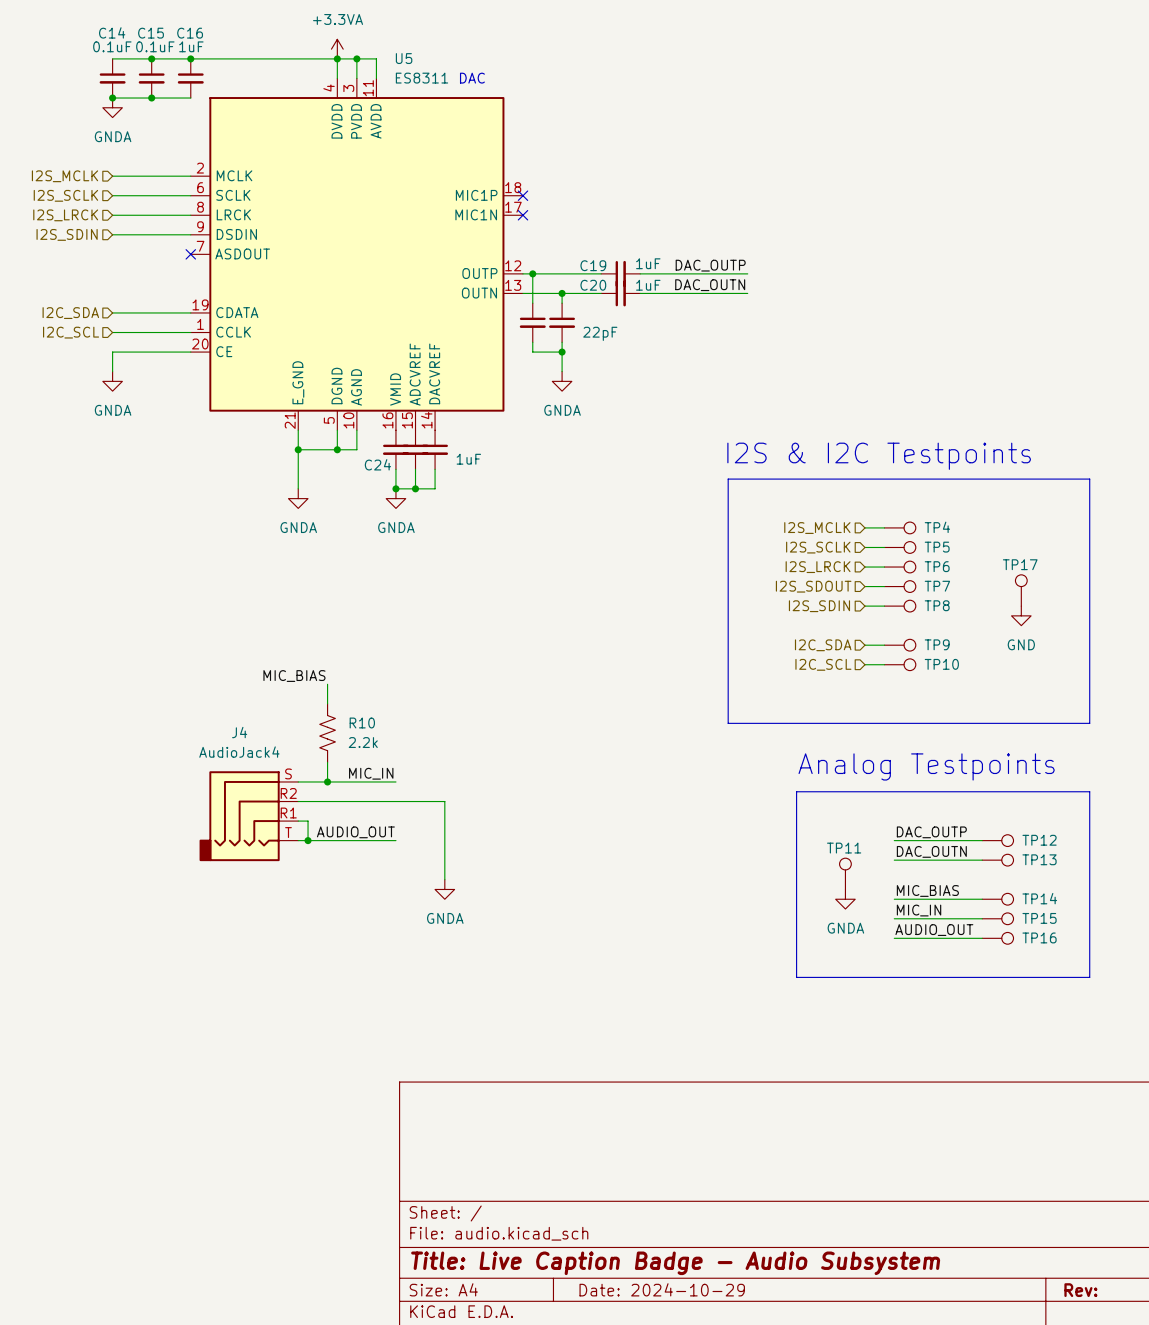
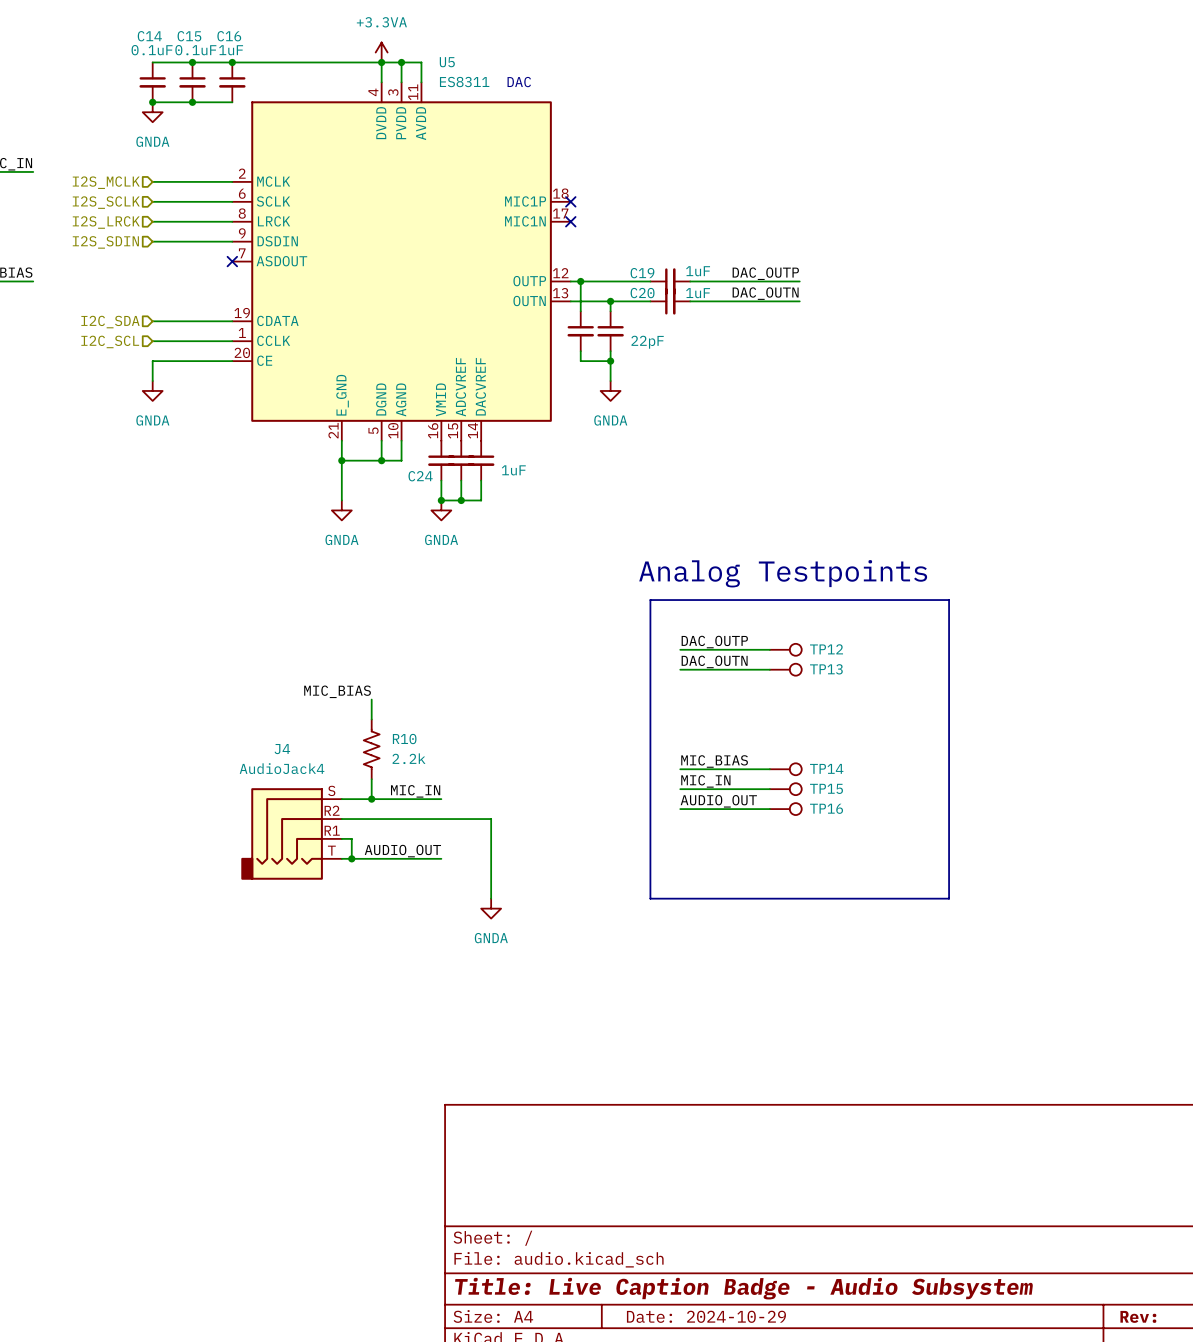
text: I2S & I2C Testpoints (879, 456) -> none
line: (728, 479) (1089, 479) (1089, 723) (728, 723) (728, 479) -> none
wire: (864, 527) (884, 527) -> none
TP4: (900, 527) -> none
hierarchical label: I2S_MCLK (817, 528) -> none
hierarchical label: I2S_SCLK (818, 547) -> none
wire: (864, 547) (884, 547) -> none
TP5: (900, 547) -> none
text: none -> Analog Testpoints (783, 573)
hierarchical label: I2S_LRCK (818, 567) -> none
wire: (864, 567) (884, 567) -> none
TP6: (900, 567) -> none
line: none -> (650, 600) (949, 600) (949, 898) (650, 898) (650, 600)
hierarchical label: I2S_SDOUT (813, 586) -> none
TP7: (900, 586) -> none
TP17: (1021, 590) -> none
hierarchical label: I2S_SDIN (819, 606) -> none
wire: (864, 606) (884, 606) -> none
TP8: (900, 606) -> none
power symbol: GND (1021, 615) -> none
label: none -> DAC_OUTP (714, 642)
wire: none -> (680, 649) (769, 649)
hierarchical label: I2C_SDA (823, 645) -> none
wire: (864, 645) (884, 645) -> none
TP9: (900, 645) -> none
label: none -> DAC_OUTN (714, 661)
wire: none -> (680, 669) (769, 669)
hierarchical label: I2C_SCL (823, 664) -> none
wire: (864, 664) (884, 664) -> none
TP10: (900, 664) -> none
label: none -> MIC_BIAS (714, 761)
wire: none -> (680, 769) (769, 769)
label: none -> MIC_IN (705, 781)
text: Analog Testpoints (926, 766) -> none
wire: none -> (680, 789) (769, 789)
label: none -> AUDIO_OUT (718, 801)
wire: none -> (680, 809) (769, 809)
line: (796, 791) (1089, 791) (1089, 977) (796, 977) (796, 791) -> none
label: DAC_OUTP (931, 832) -> none
wire: (894, 840) (982, 840) -> none
TP12 position: (997, 840) -> (785, 649)
label: DAC_OUTN (931, 851) -> none
wire: (894, 860) (982, 860) -> none
TP13 position: (997, 860) -> (785, 669)
TP11: (845, 873) -> none
label: MIC_BIAS (927, 890) -> none
power symbol: GNDA (845, 899) -> none
wire: (894, 899) (982, 899) -> none
TP14 position: (997, 899) -> (785, 769)
label: MIC_IN (919, 910) -> none
wire: (894, 918) (982, 918) -> none
TP15 position: (997, 918) -> (785, 789)
label: AUDIO_OUT (934, 930) -> none
wire: (894, 938) (982, 938) -> none
TP16 position: (997, 938) -> (785, 809)

